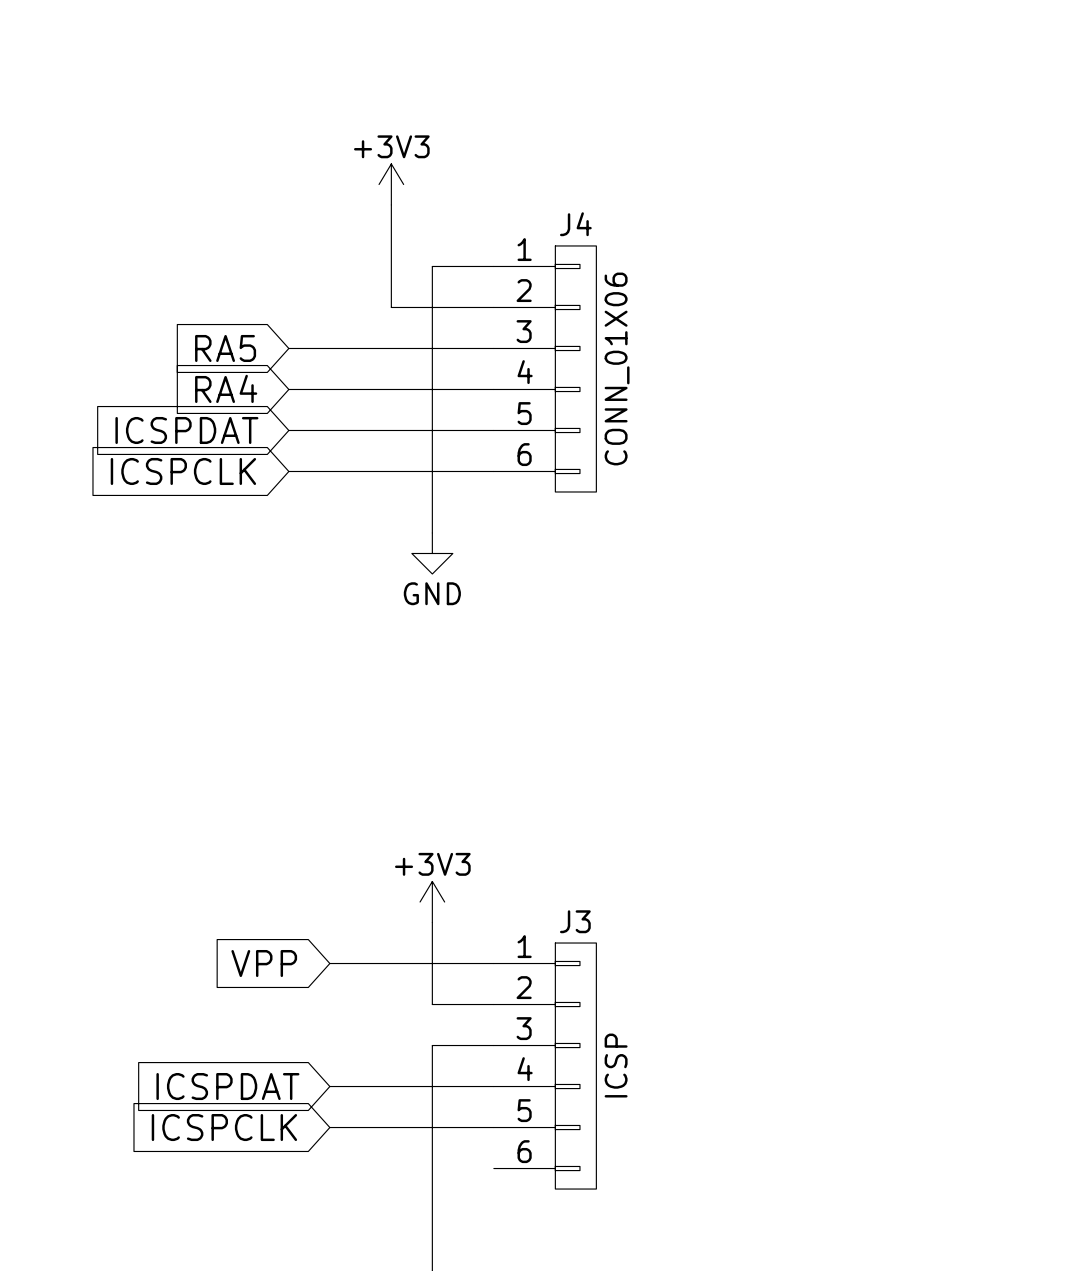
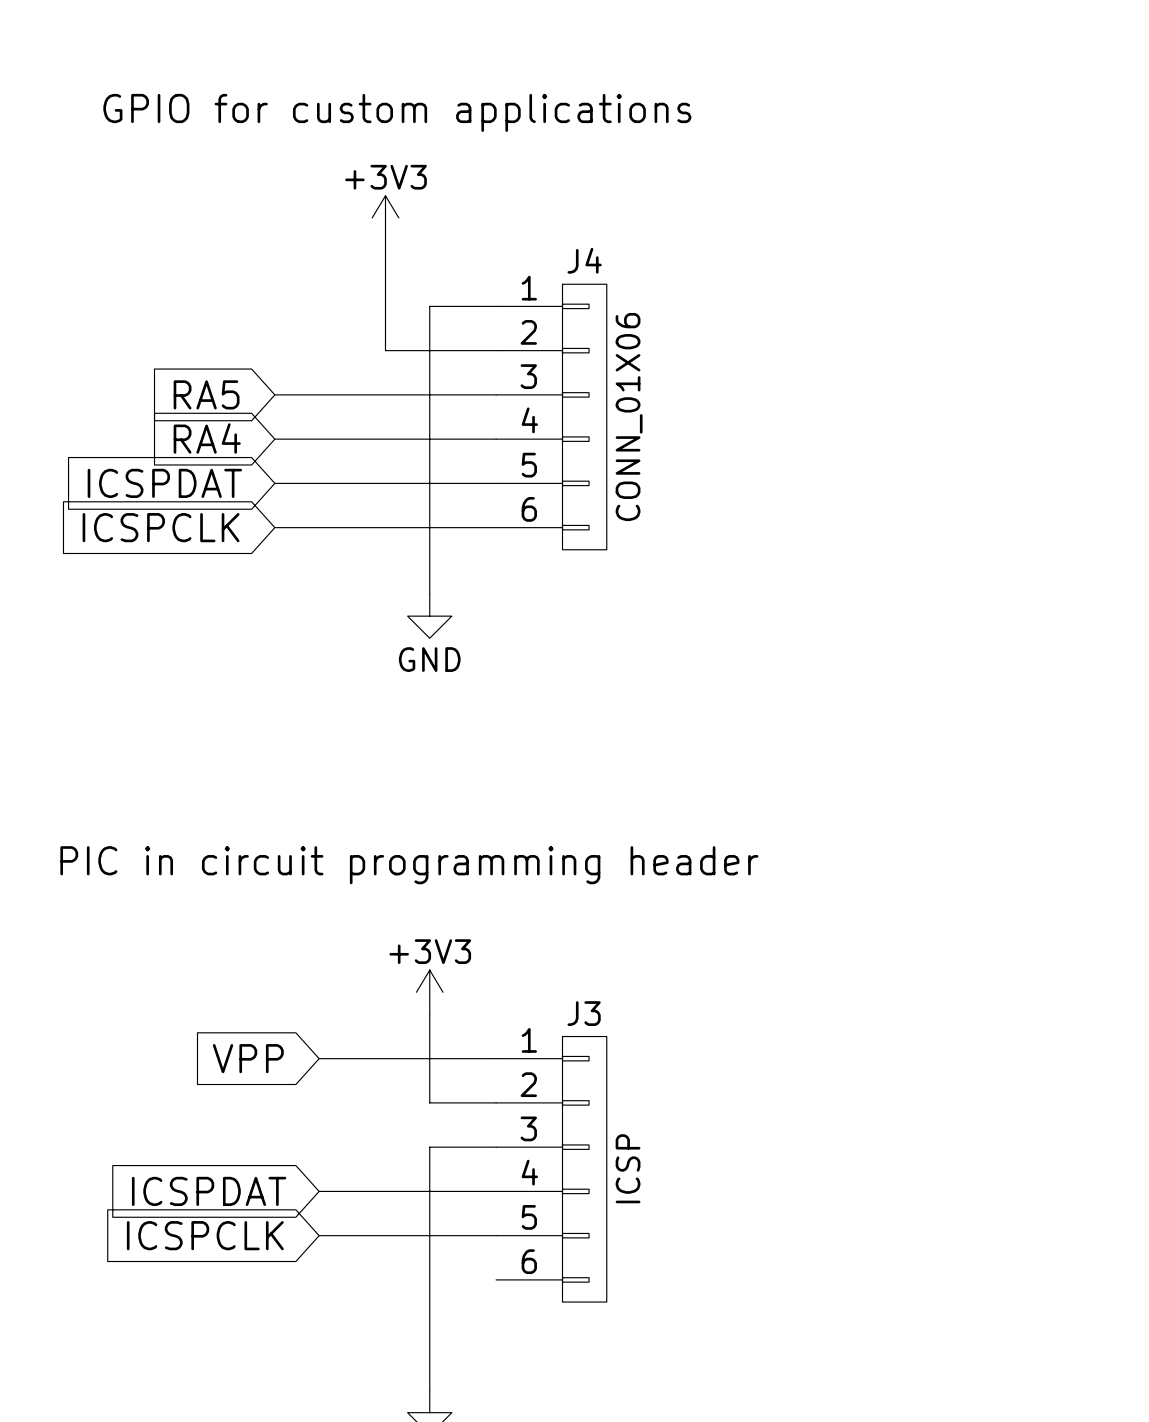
text: none -> GPIO for custom applications (397, 112)
text: none -> PIC in circuit programming header (409, 865)

